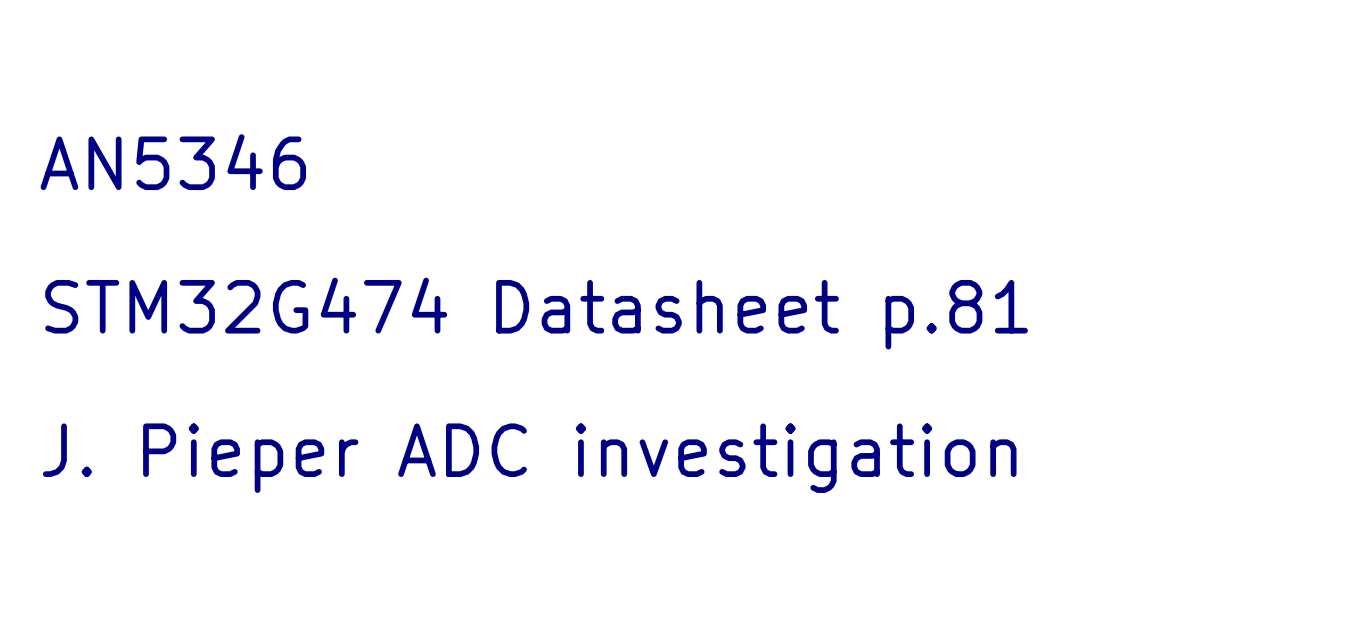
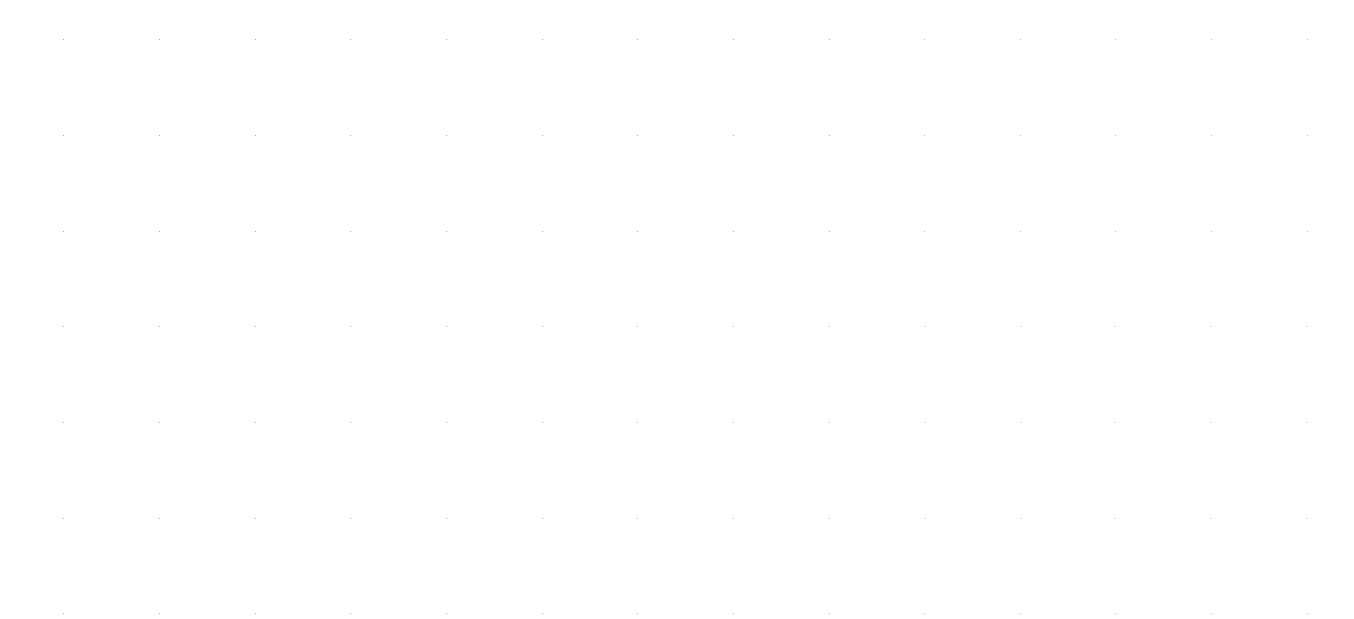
text: AN5346 (173, 162) -> none
text: STM32G474 Datasheet p.81 (536, 313) -> none
text: J. Pieper ADC investigation (529, 458) -> none

